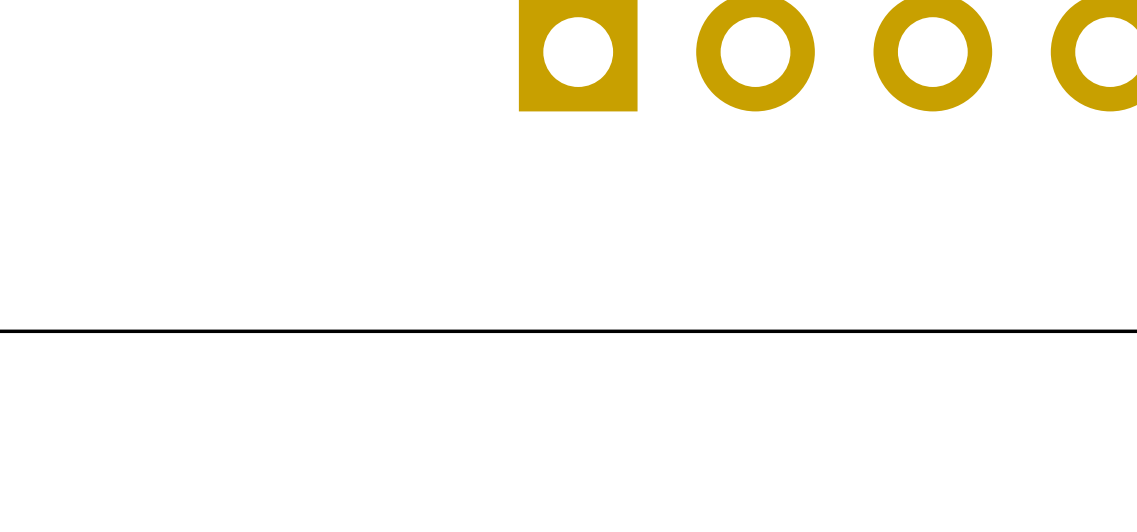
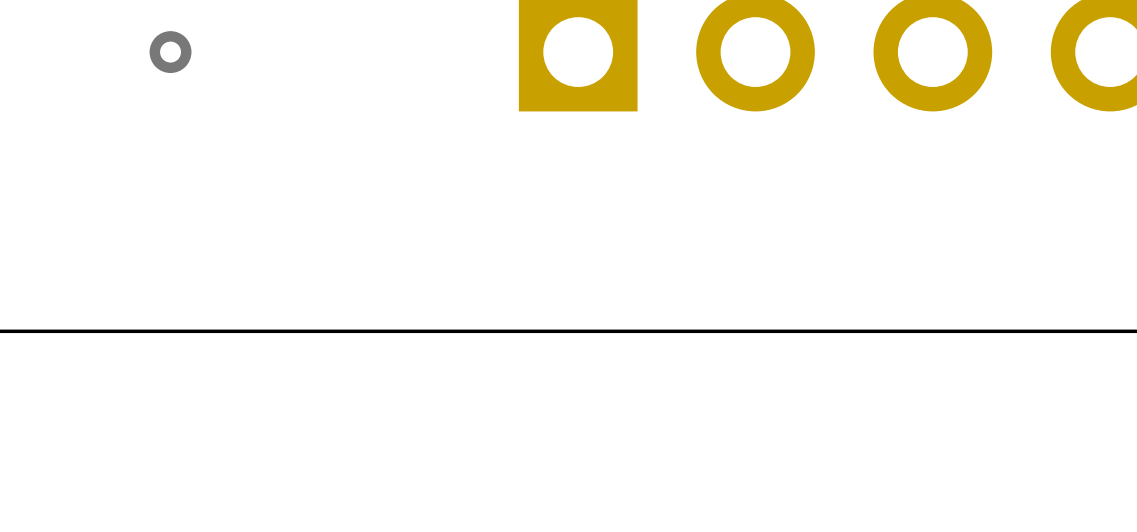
via: none -> (170, 52)

